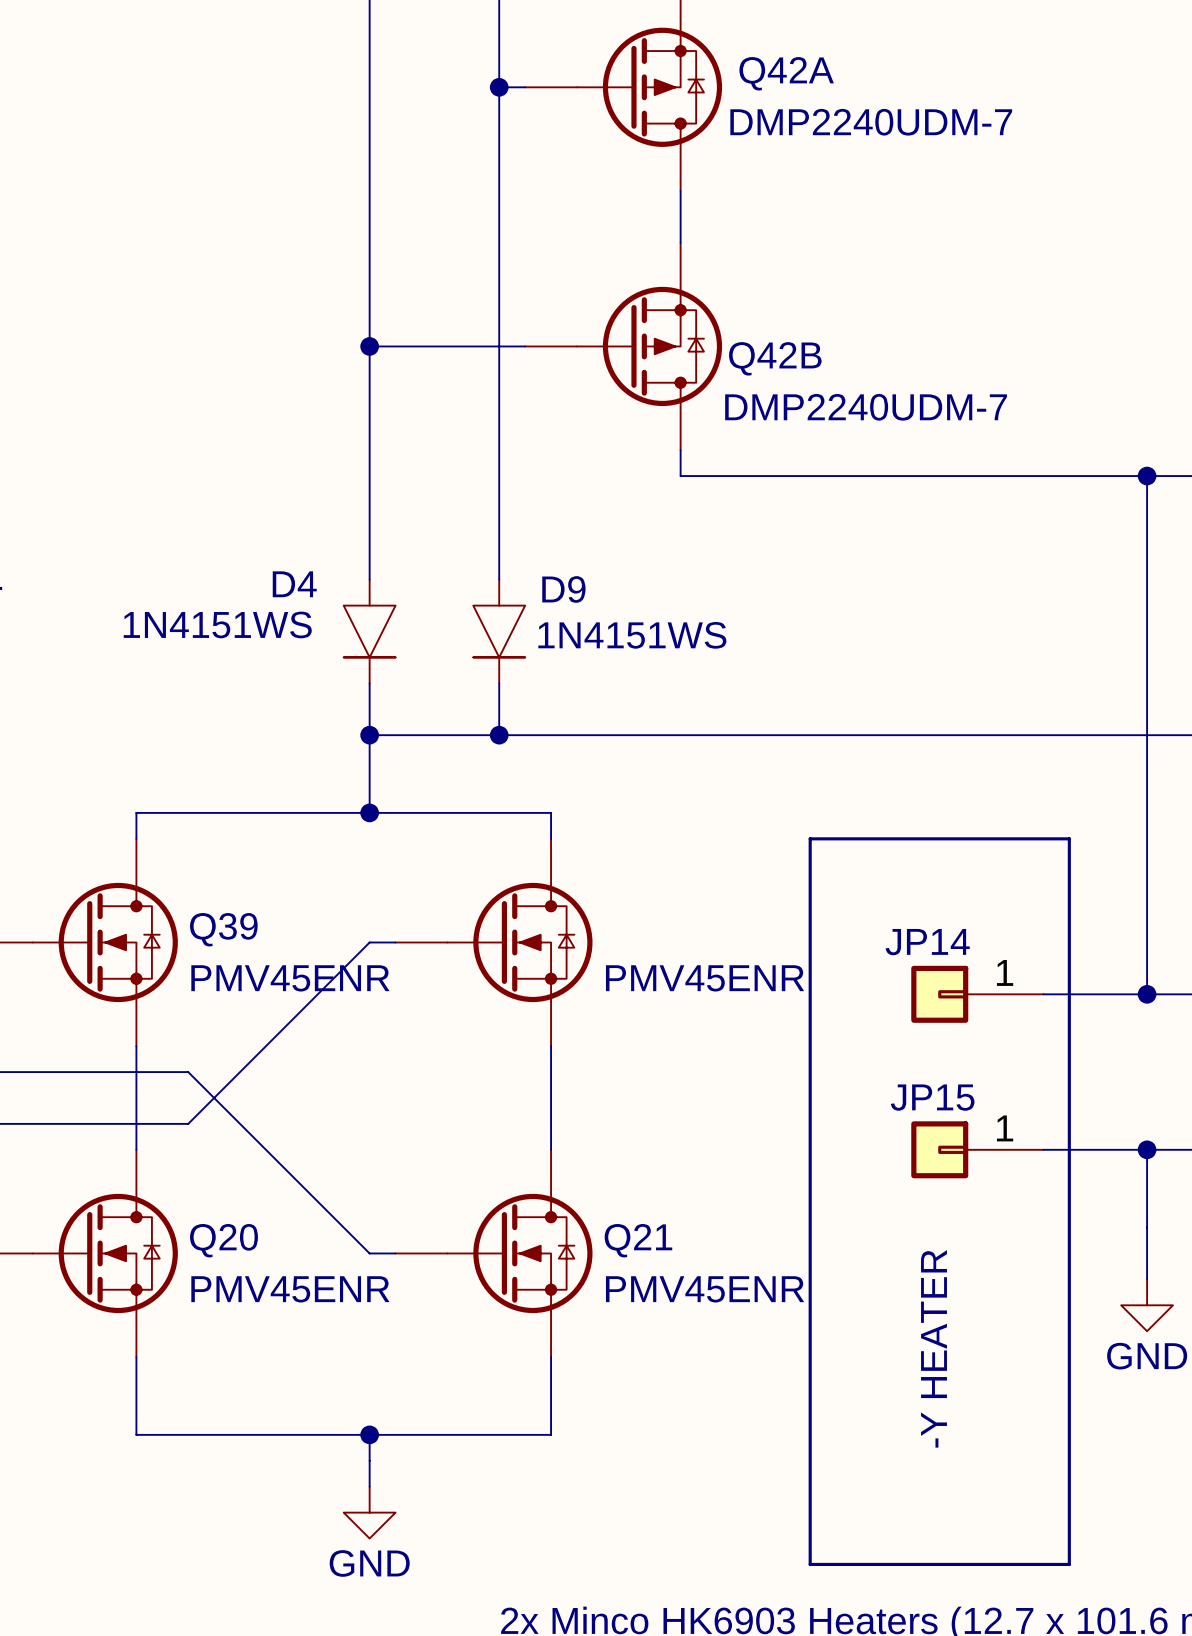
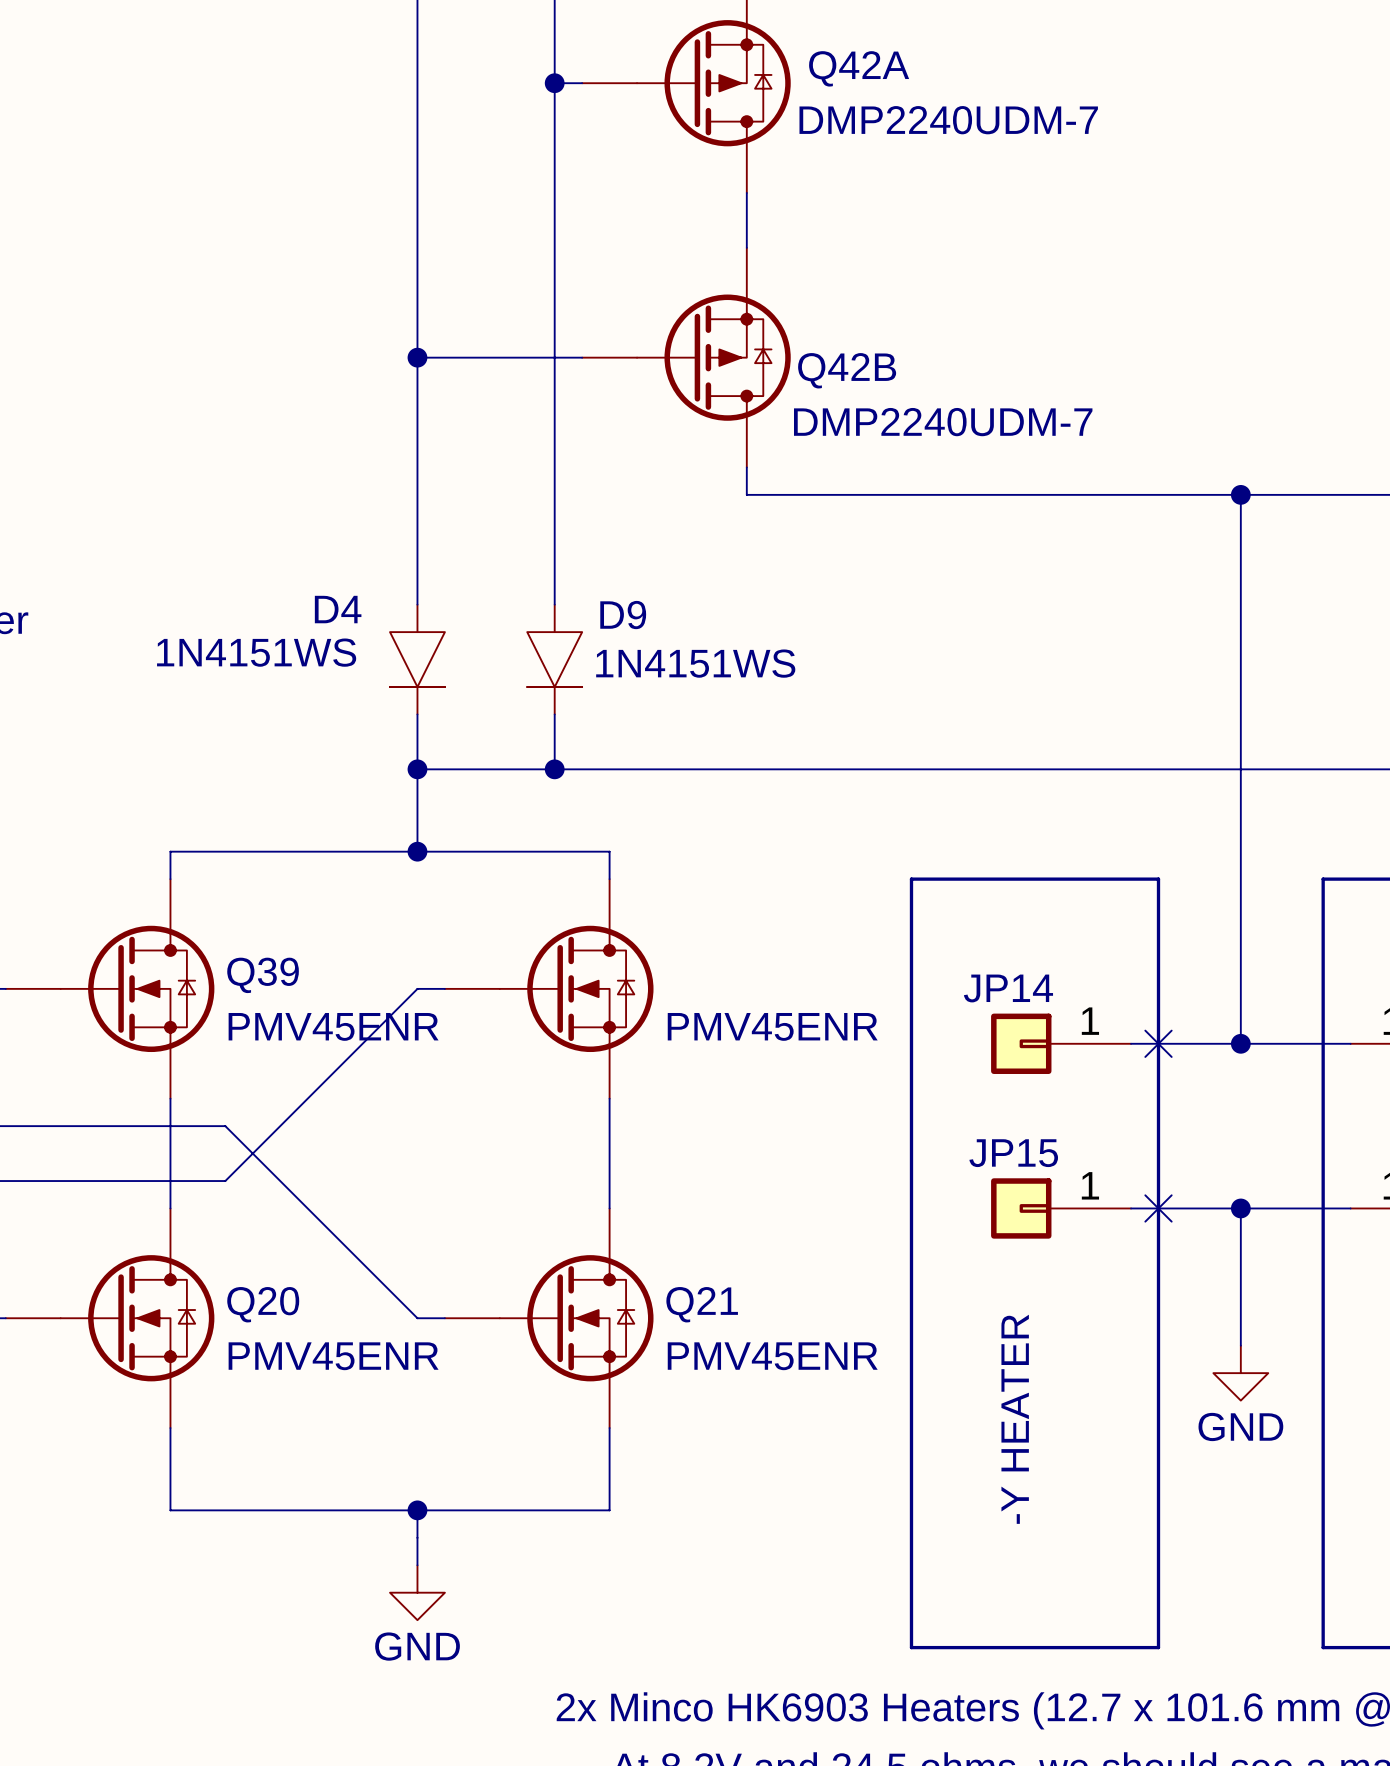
line: (836, 838) (810, 838) (810, 1564) (836, 1564) -> (911, 879) (911, 1647)
no-connect mark: none -> (1158, 1043)
no-connect mark: none -> (1158, 1208)

